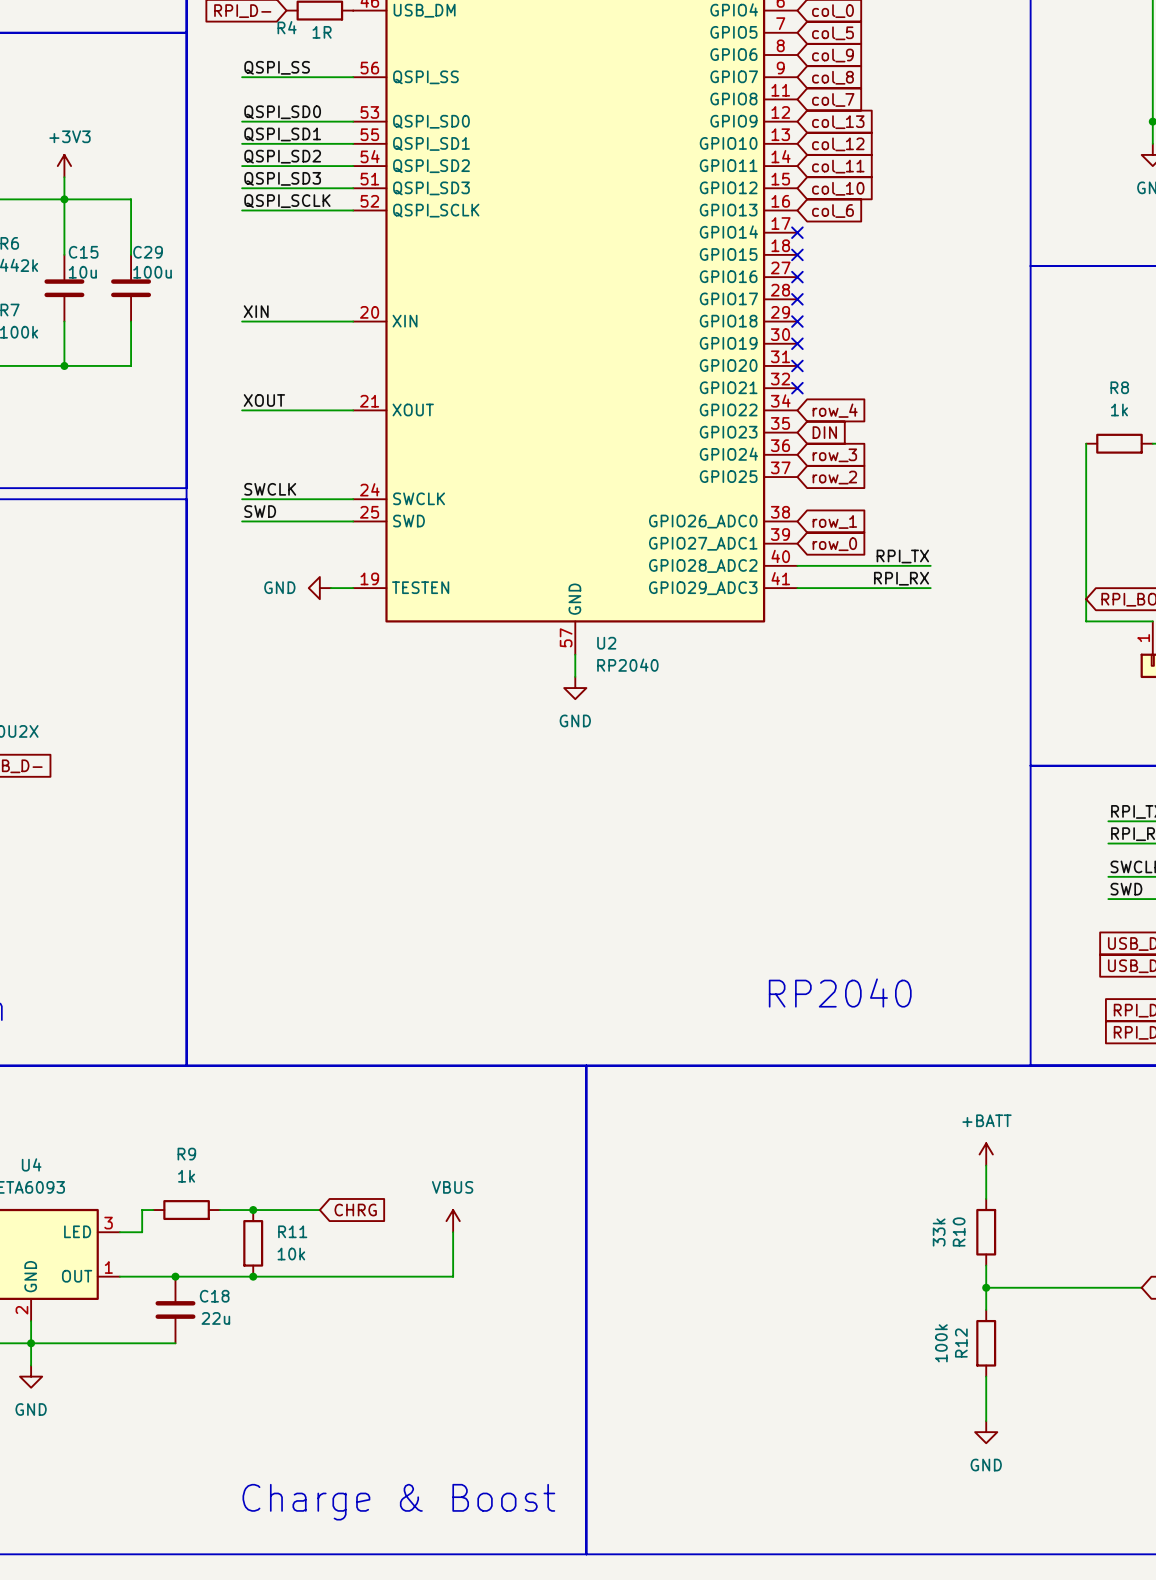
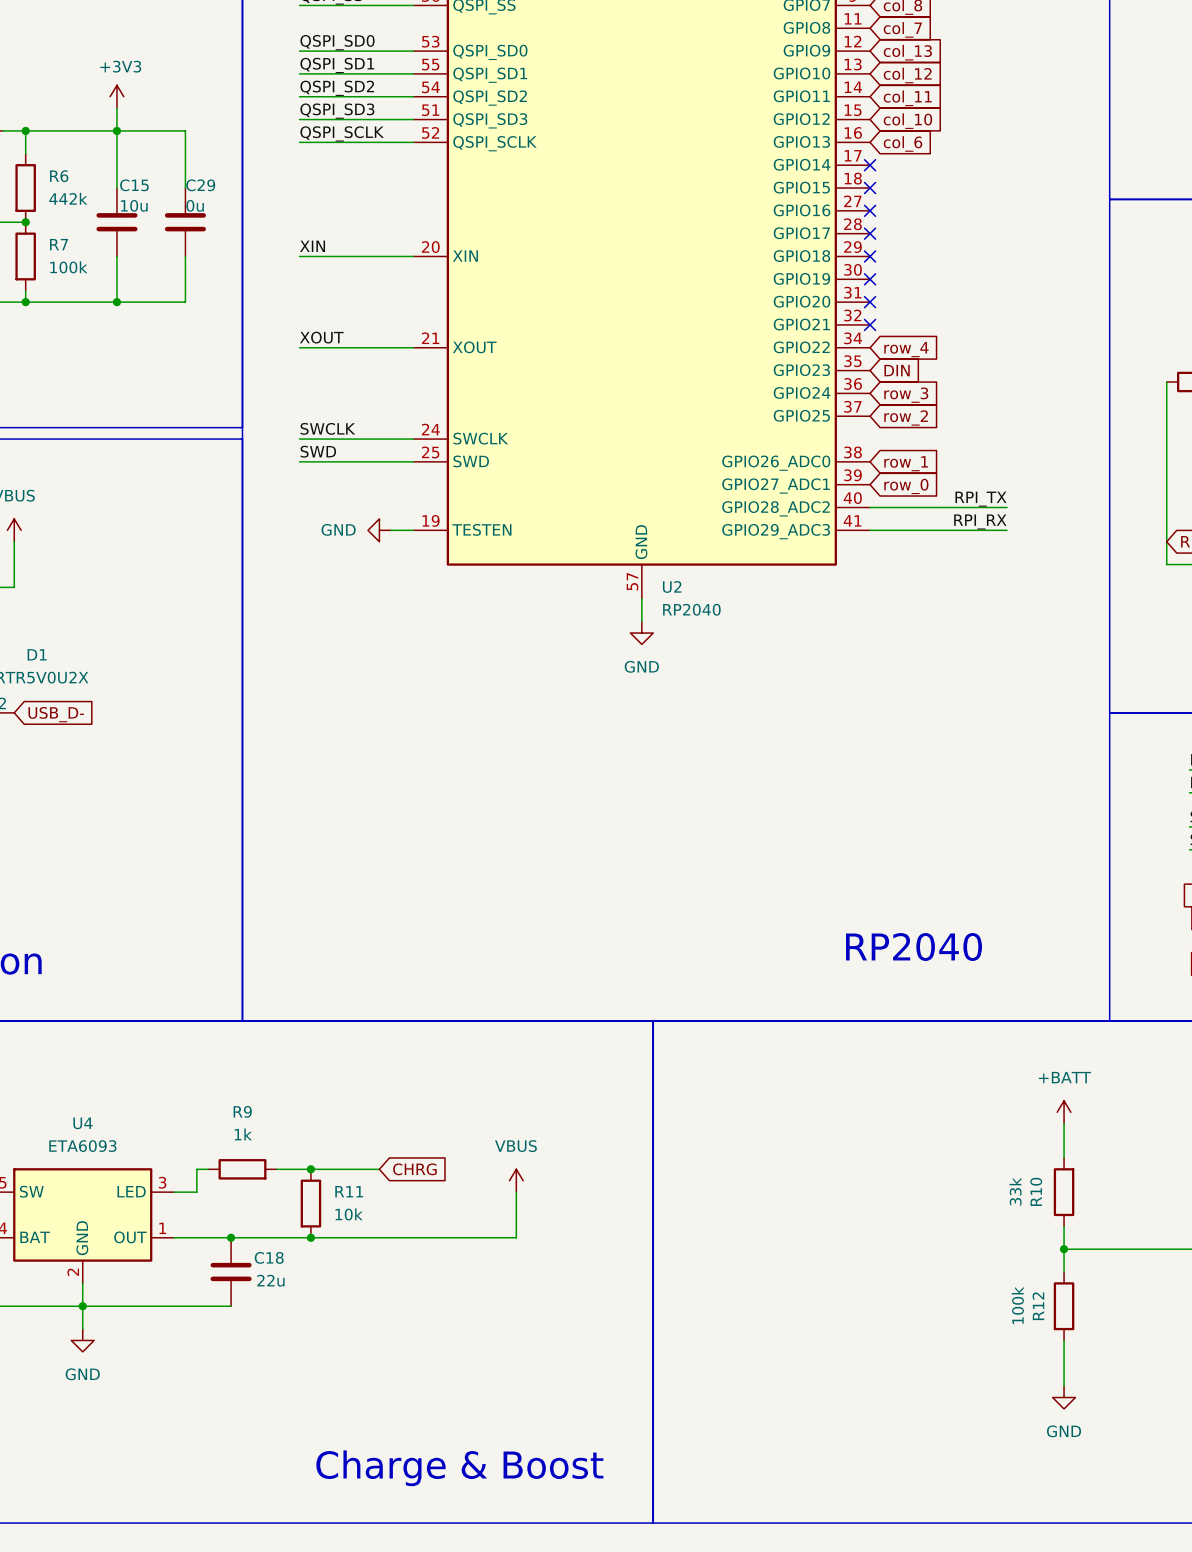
C29 value: 100u (152, 272) -> 0u (195, 205)

